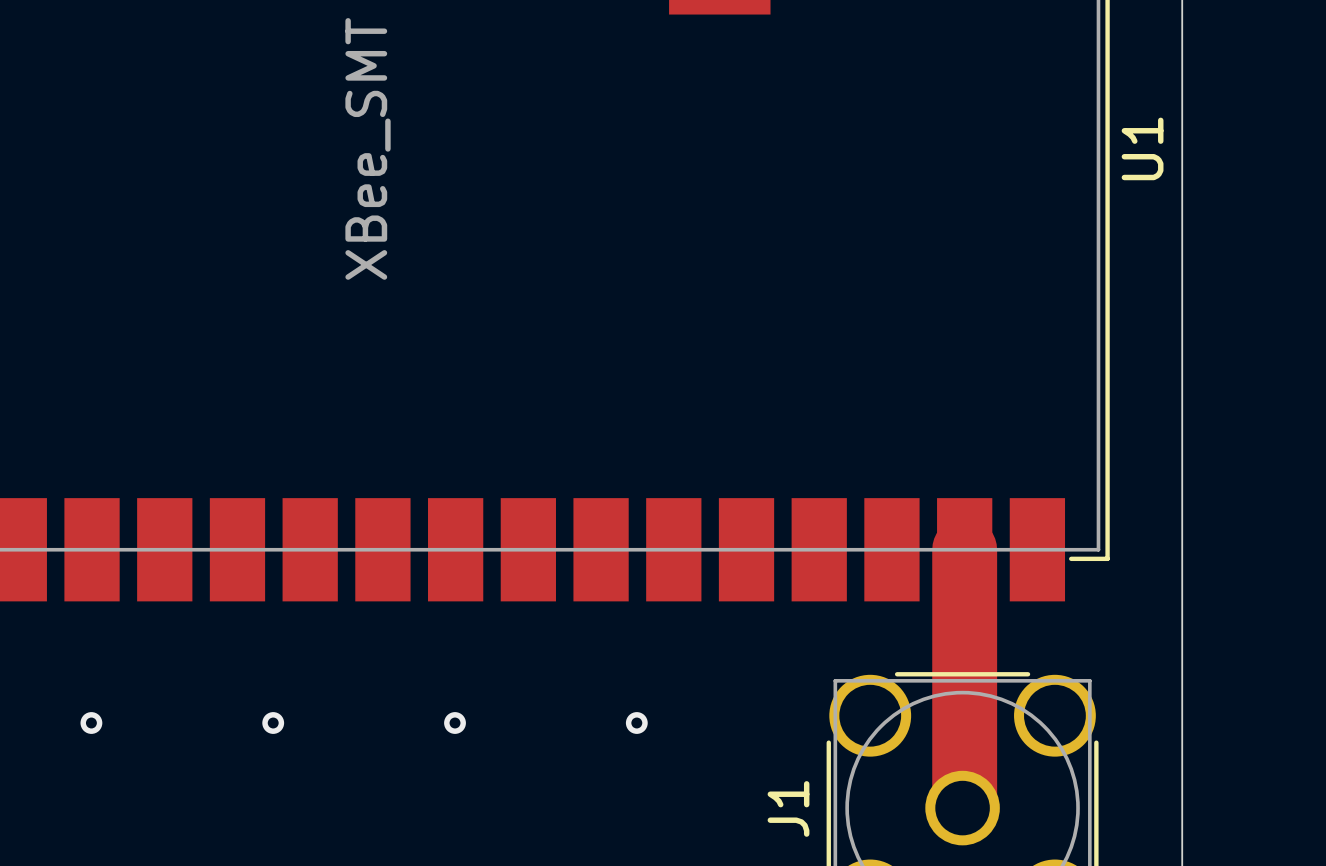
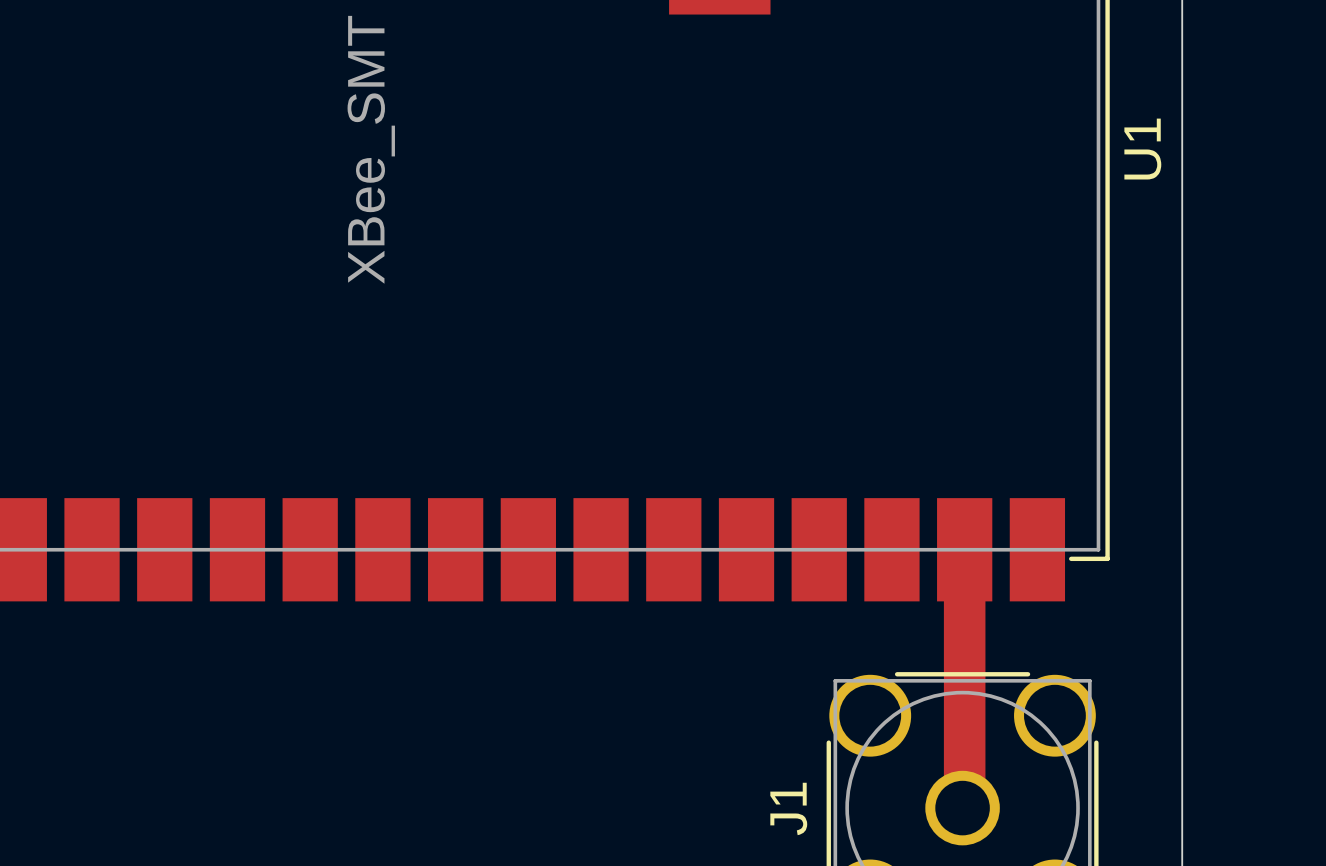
top track width: thick (964, 549) (964, 805) -> thin (964, 549) (964, 805)
via: (91, 723) -> none
via: (273, 723) -> none
via: (455, 723) -> none
via: (636, 723) -> none

